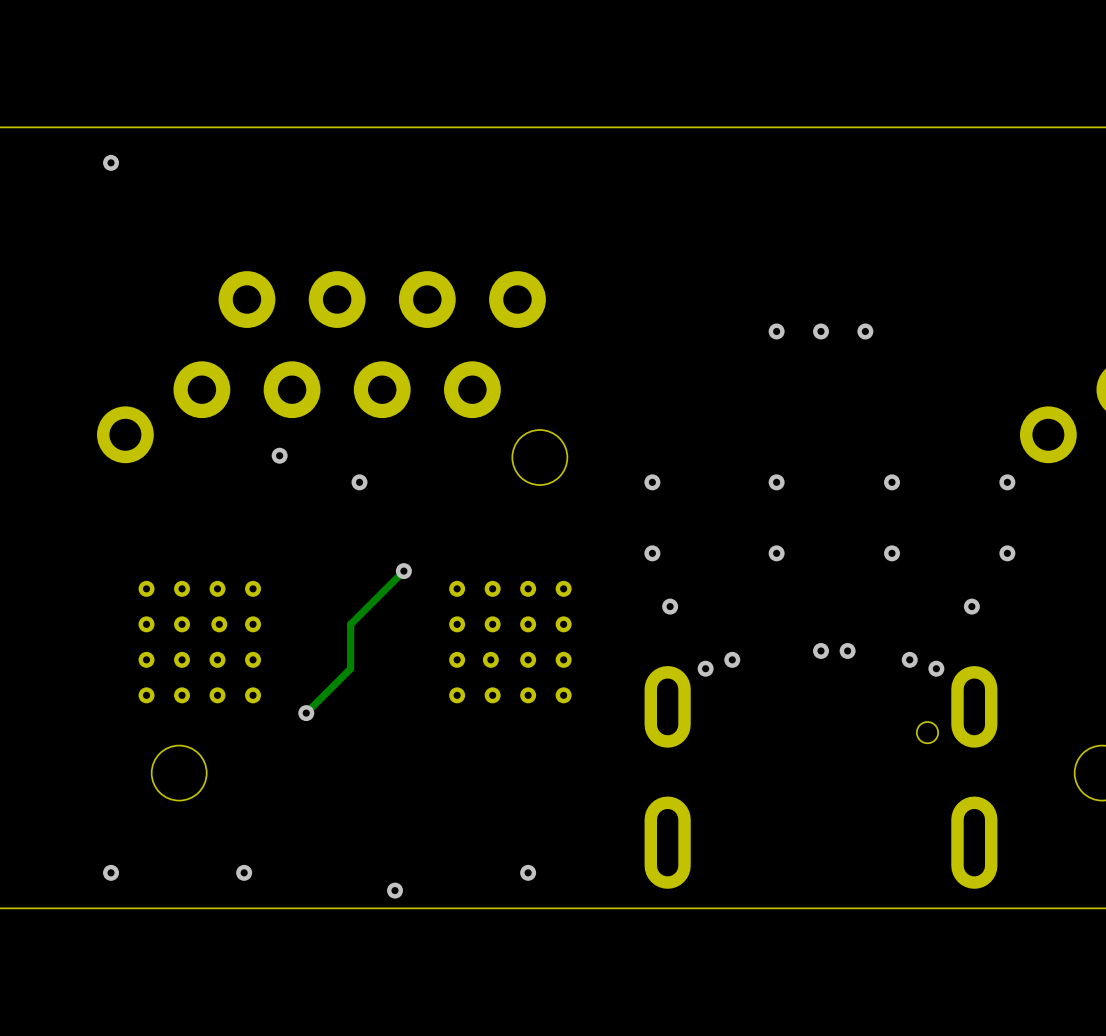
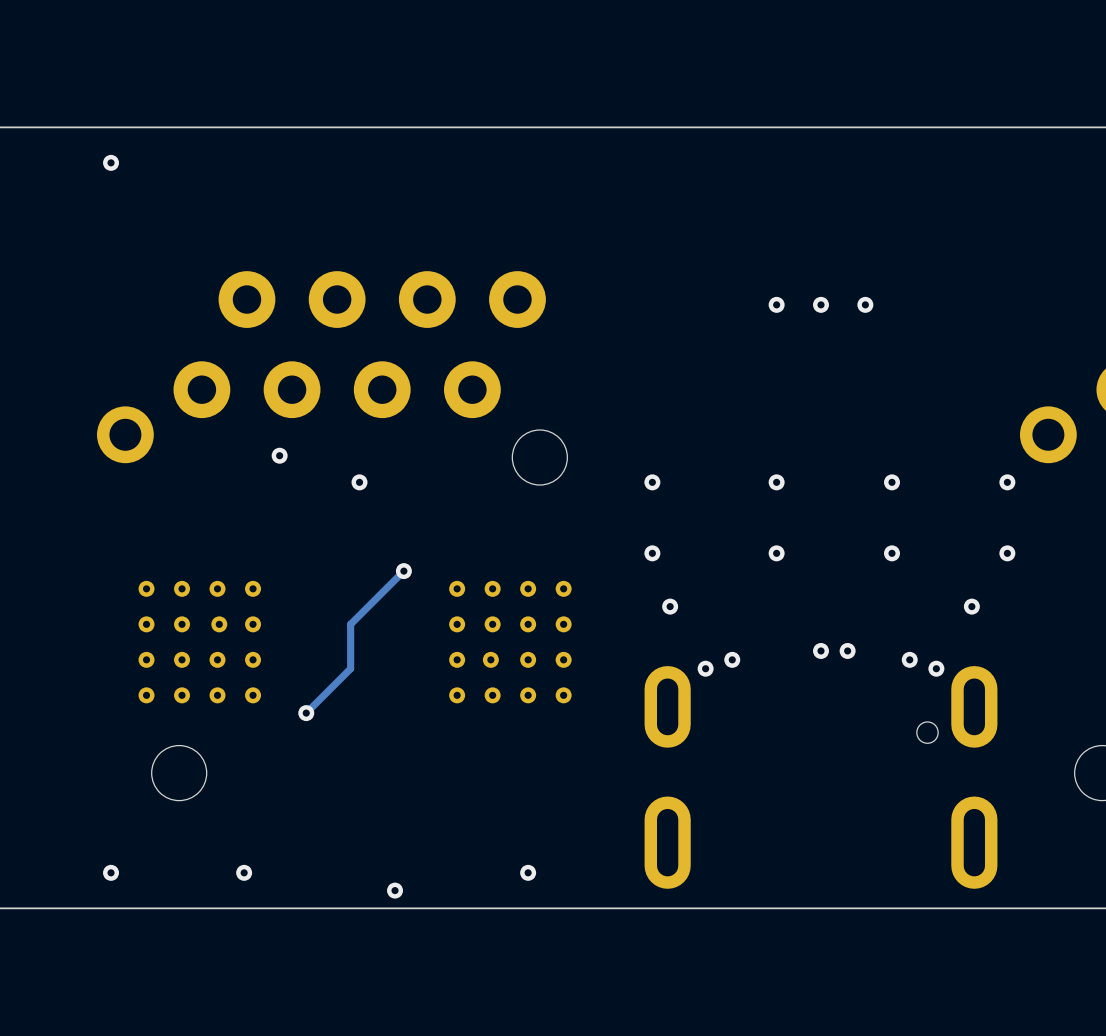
via: none -> (776, 304)
via: none -> (821, 304)
via: none -> (865, 304)
via: (776, 331) -> none
via: (821, 331) -> none
via: (865, 331) -> none

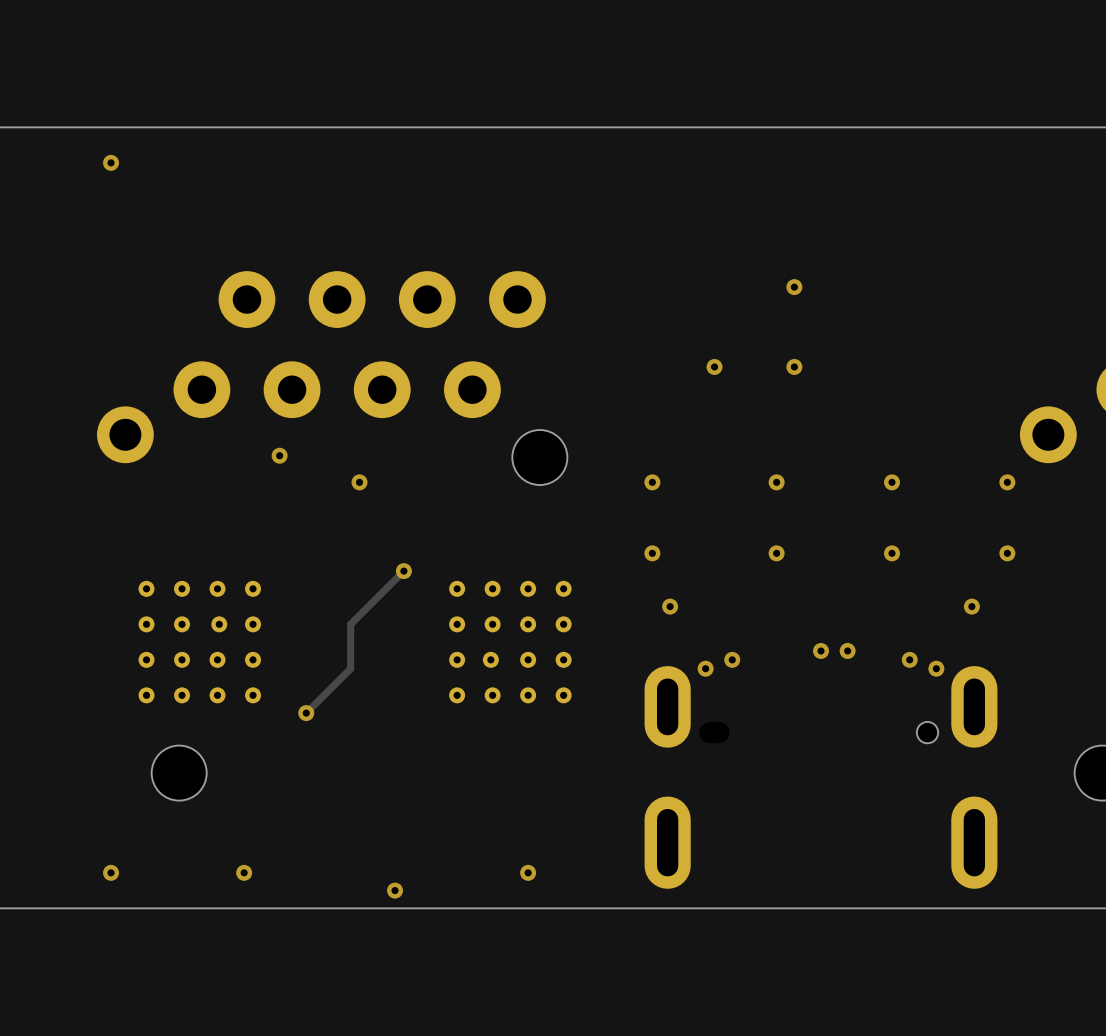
via: none -> (794, 287)
via: (776, 304) -> none
via: (821, 304) -> none
via: (865, 304) -> none
via: none -> (714, 366)
via: none -> (794, 366)

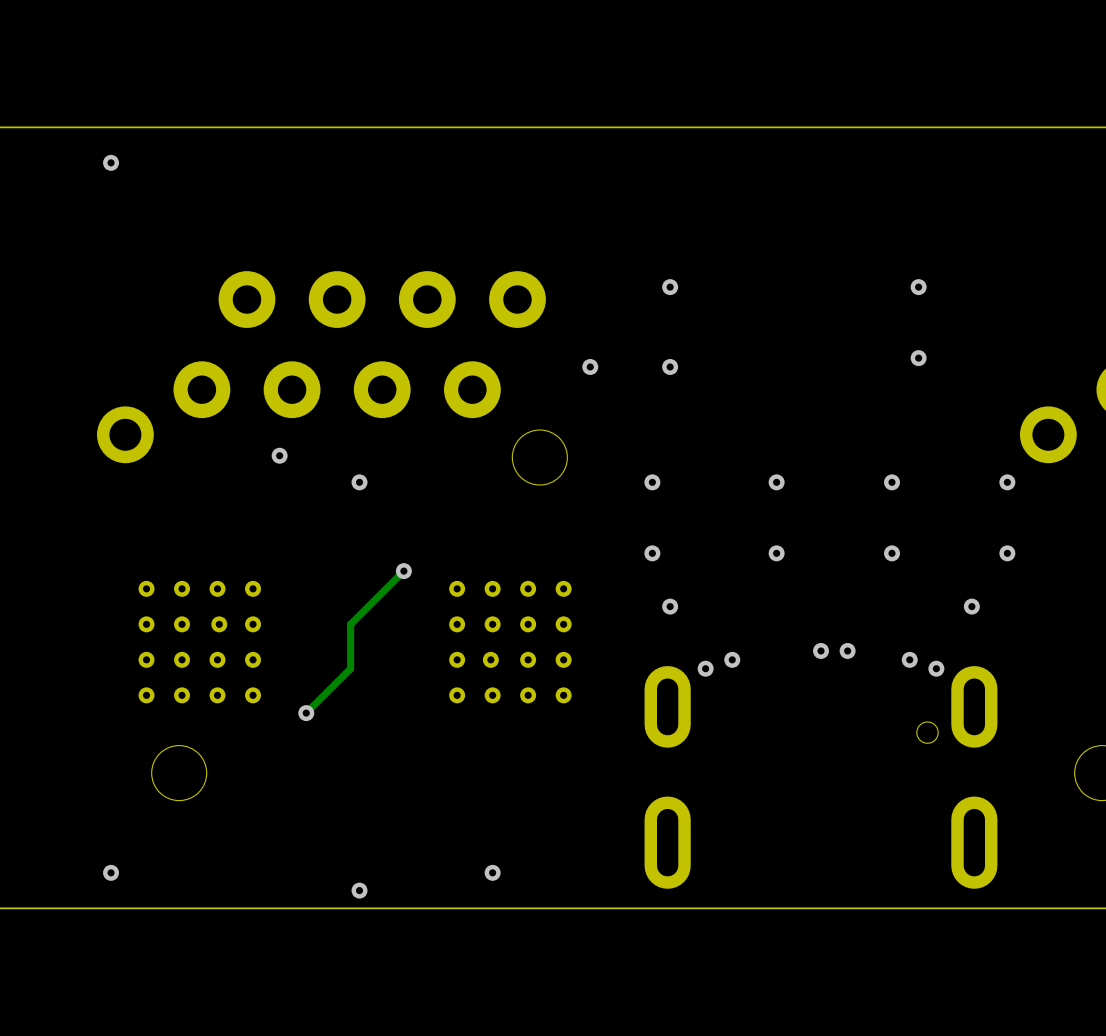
via: none -> (670, 287)
via: (794, 287) -> none
via: none -> (918, 287)
via: none -> (918, 358)
via: none -> (590, 366)
via position: (714, 366) -> (670, 366)
via: (794, 366) -> none
via: (244, 872) -> none
via position: (528, 872) -> (492, 872)
via position: (395, 890) -> (359, 890)

